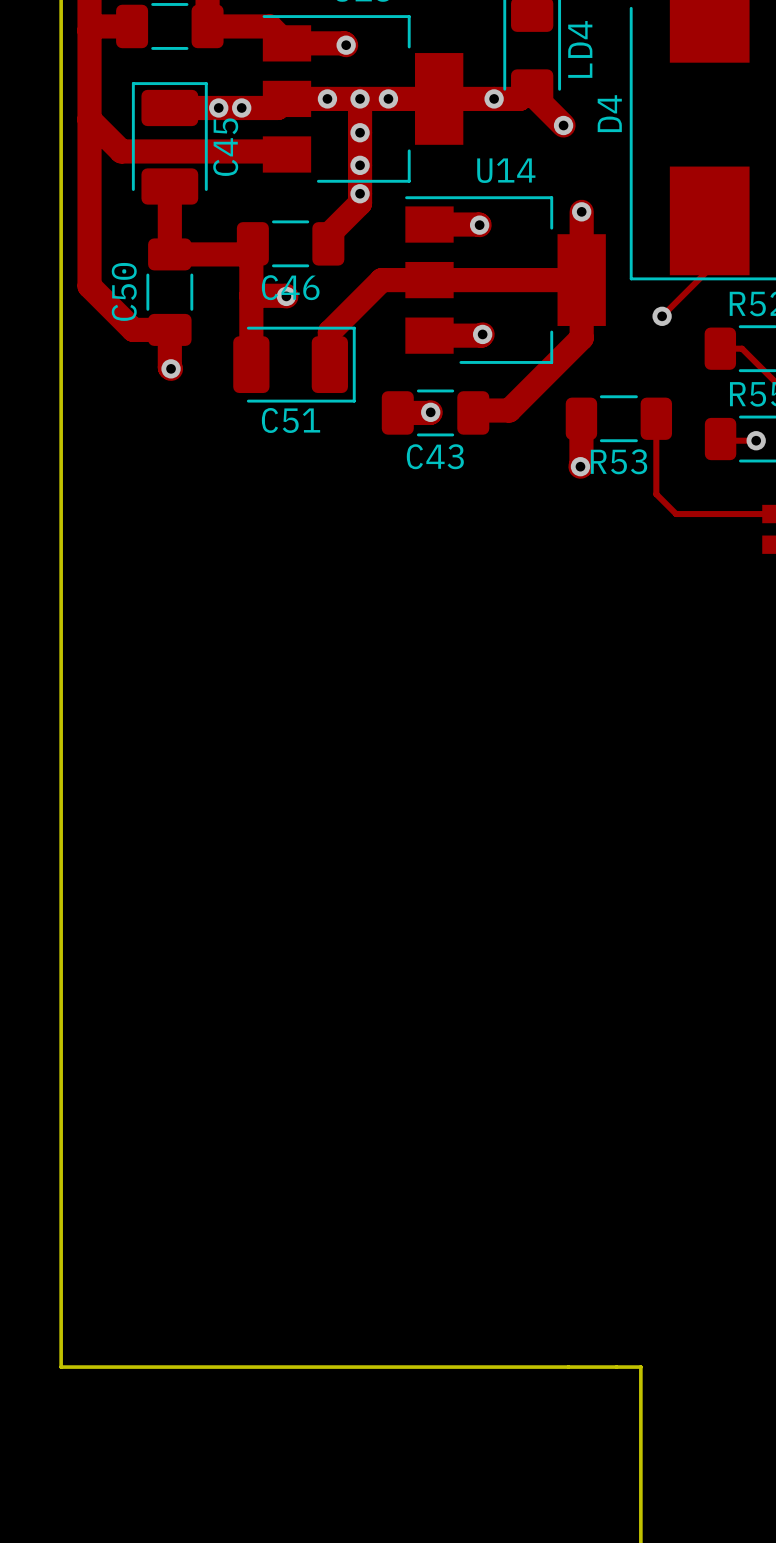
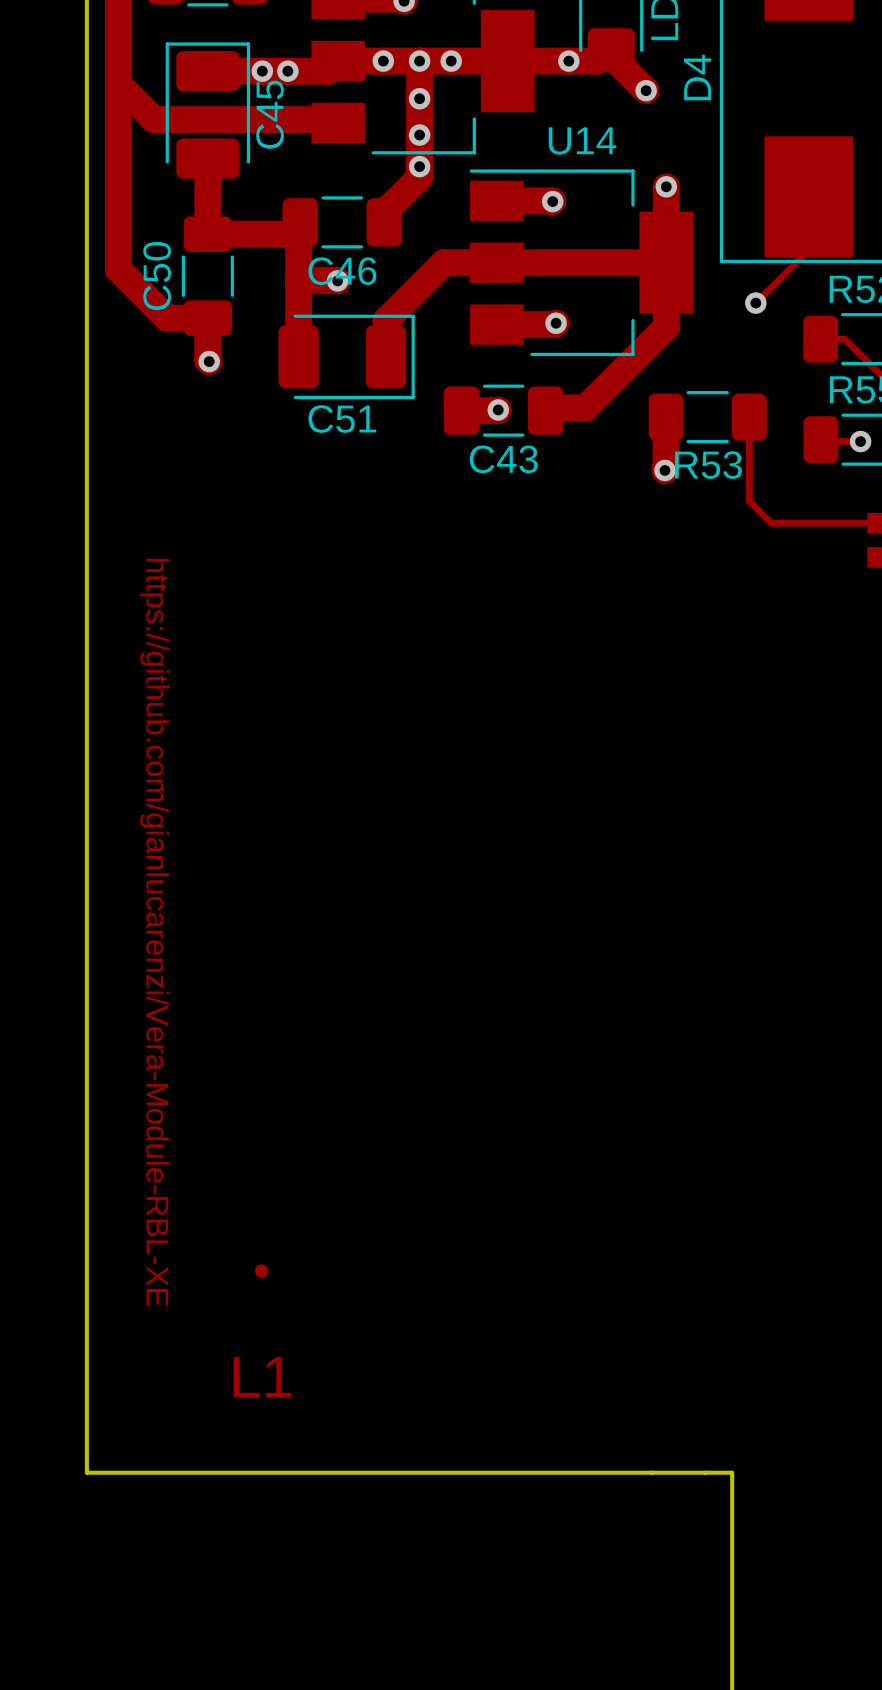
text: none -> https://github.com/gianlucarenzi/Vera-Module-RBL-XE (154, 932)
part: none -> (261, 1271)
text: none -> L1 (262, 1377)

